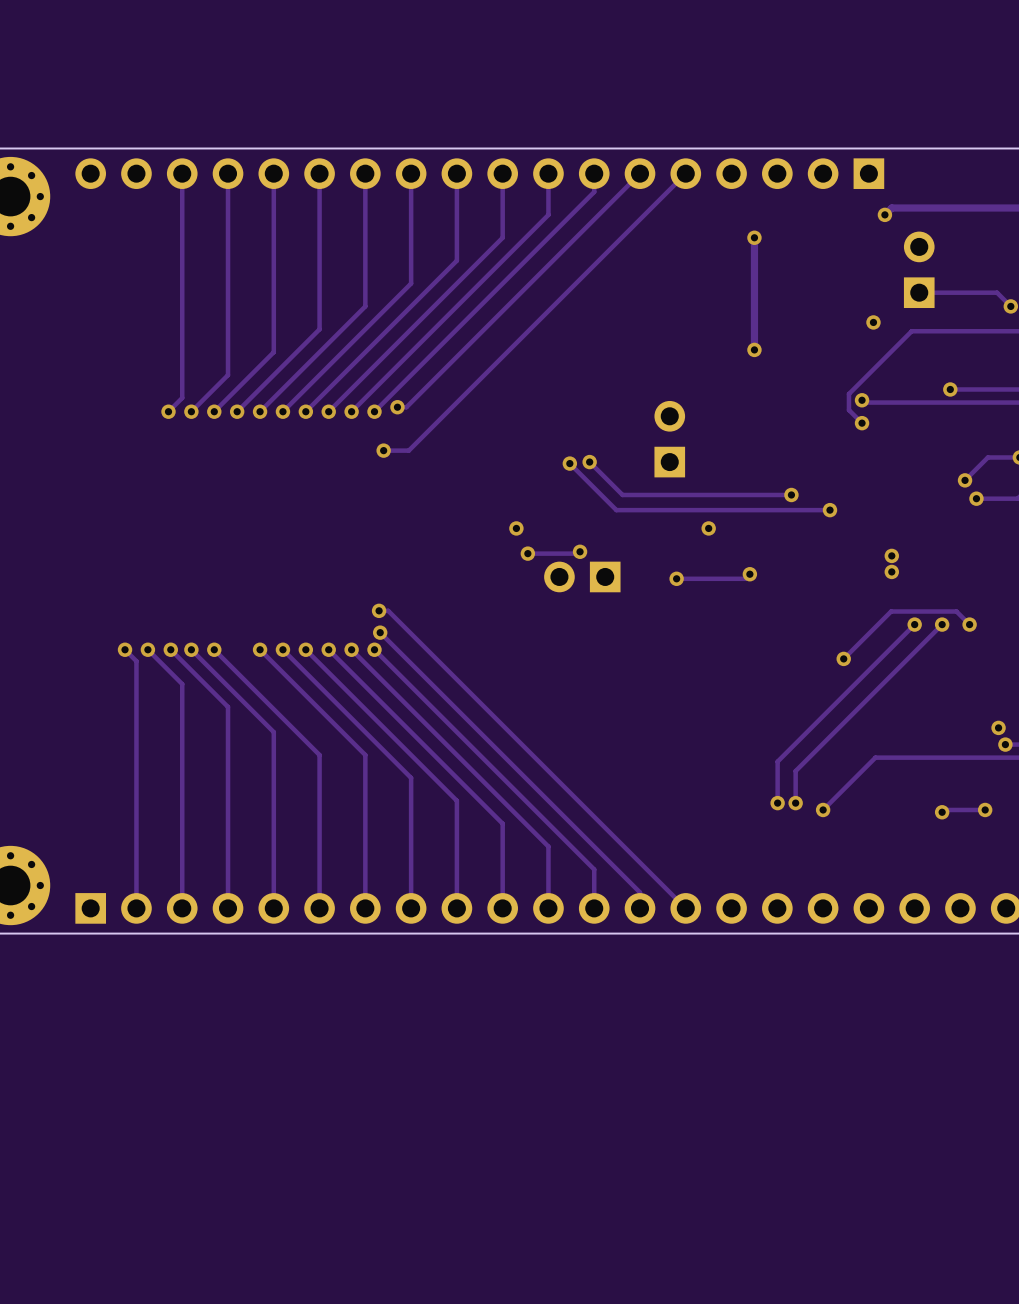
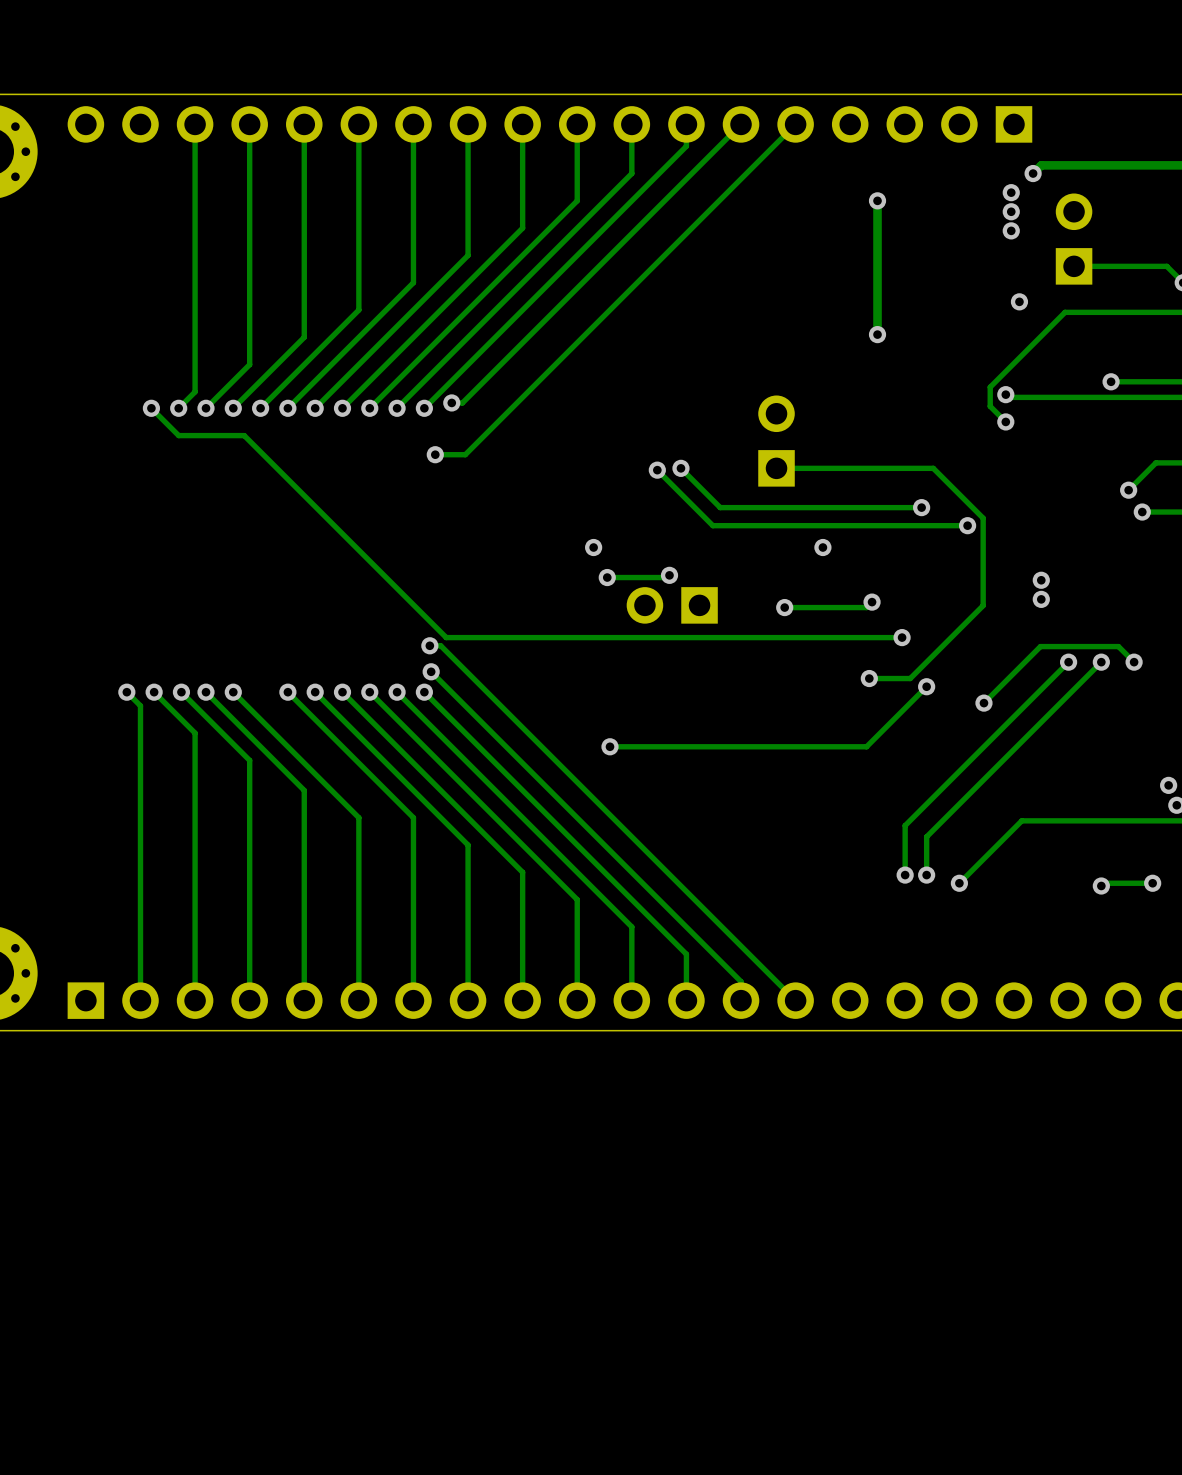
via: none -> (1011, 192)
via: none -> (1011, 211)
via: none -> (1011, 230)
track: none -> (151, 408) (178, 435) (244, 435) (446, 637) (902, 637)
via: none -> (151, 408)
track: none -> (776, 468) (933, 468) (983, 518) (983, 605) (910, 678) (869, 678)
via: none -> (902, 637)
via: none -> (869, 678)
track: none -> (926, 686) (866, 746) (610, 746)
via: none -> (926, 686)
via: none -> (610, 746)

